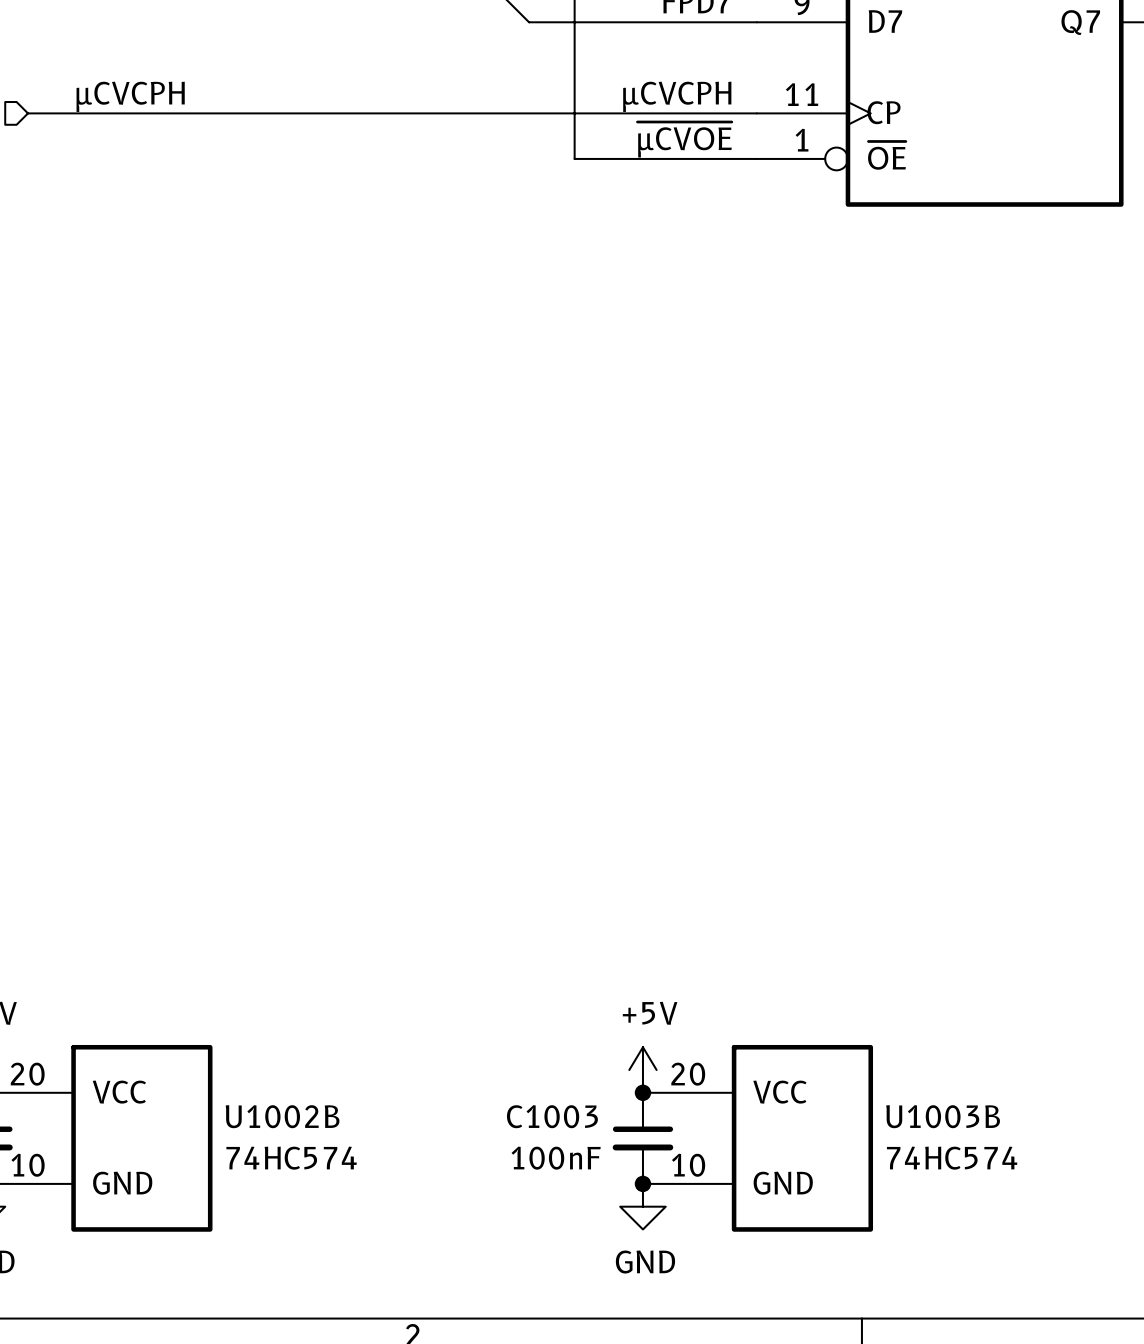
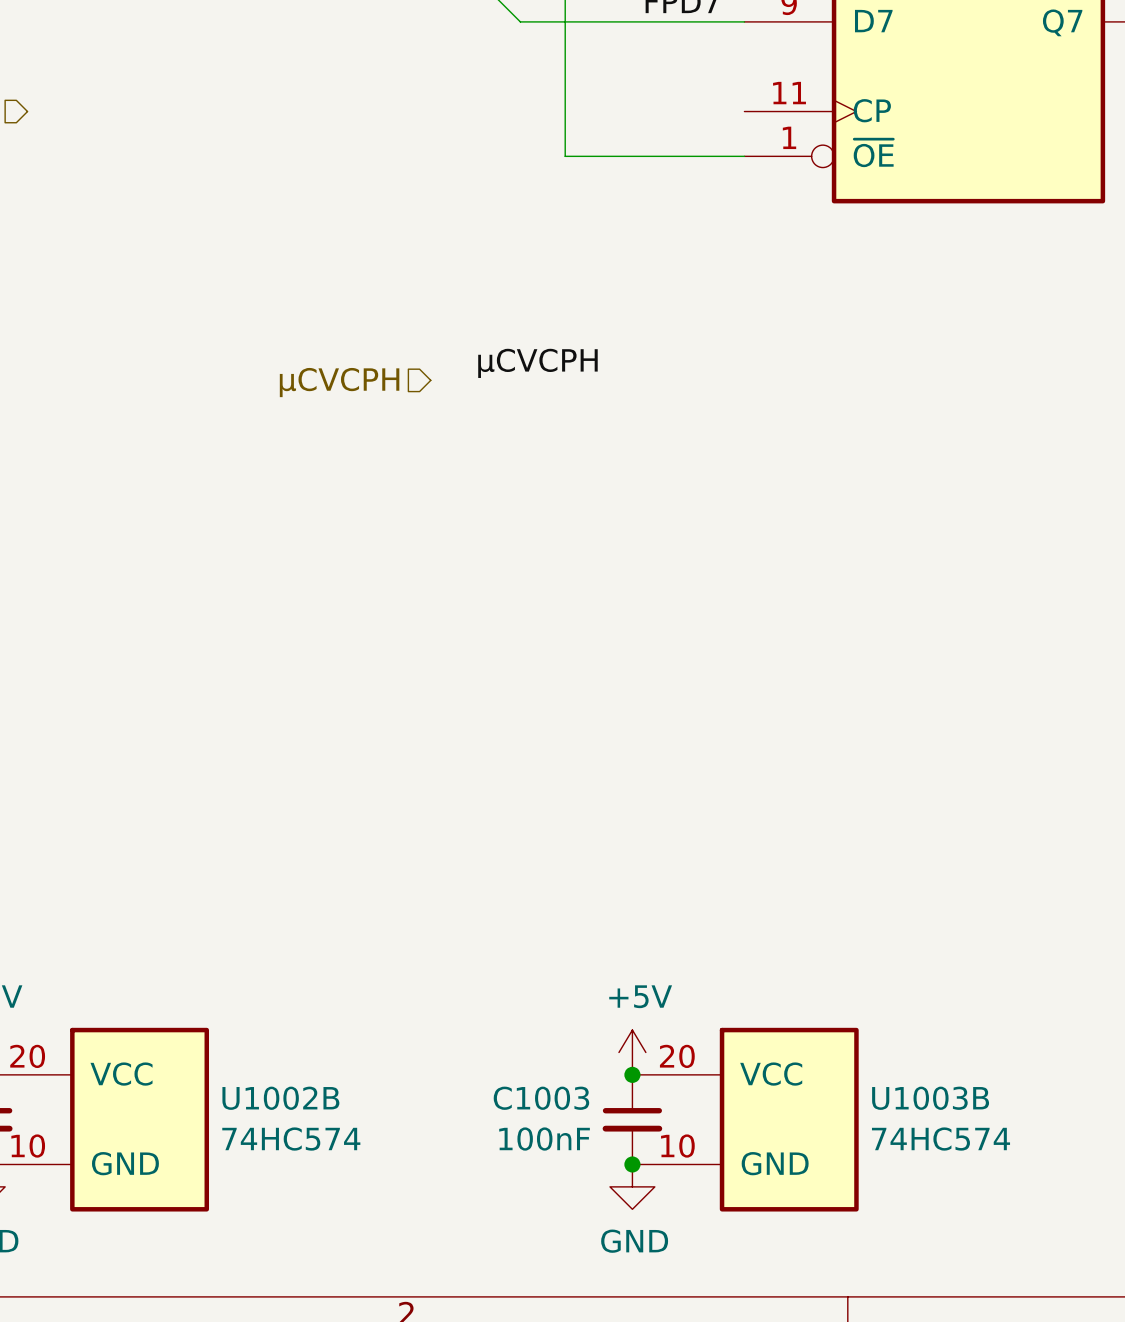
label: µCVCPH (130, 96) -> none
label: µCVCPH (677, 96) -> none
wire: (27, 113) (756, 113) -> none
label: ~{µCVOE} (684, 139) -> none
label: none -> µCVCPH (537, 363)
hierarchical label: none -> µCVCPH (339, 382)

